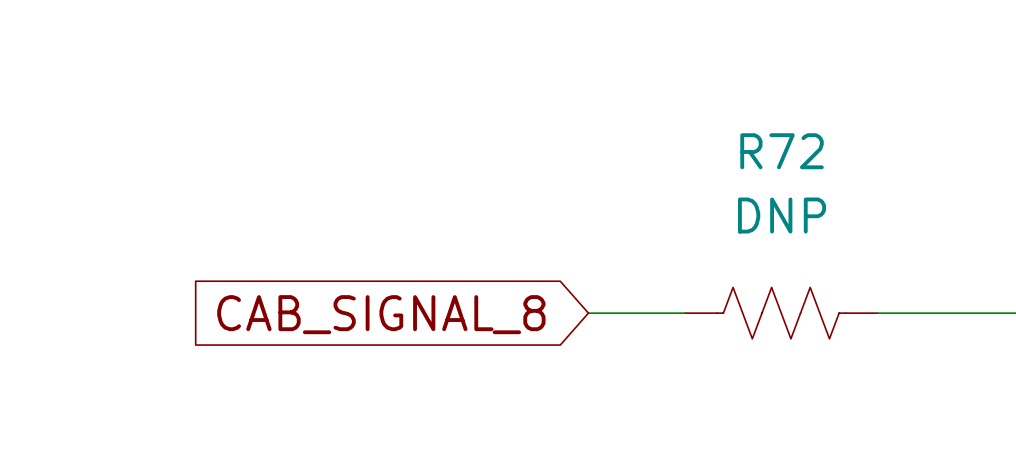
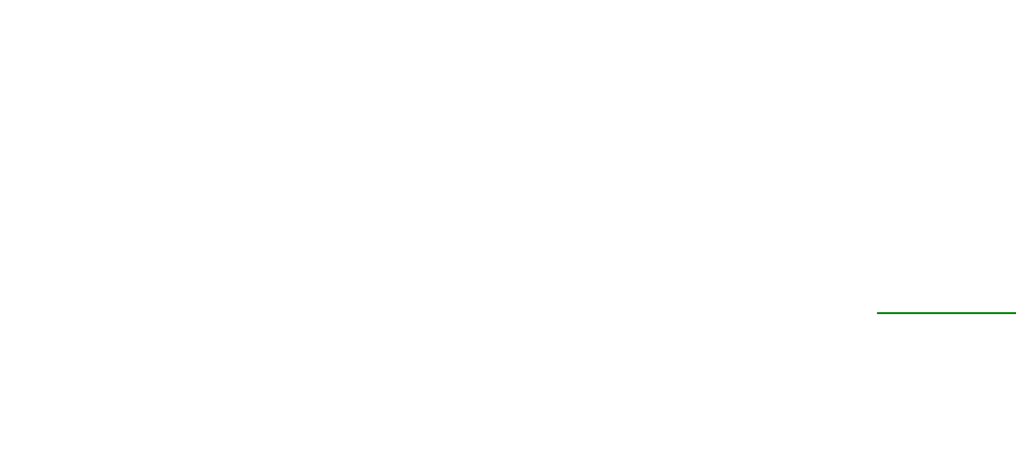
wire: (588, 313) (684, 313) -> none
R72: DNP (781, 313) -> none
global label: CAB_SIGNAL_8 (381, 314) -> none

